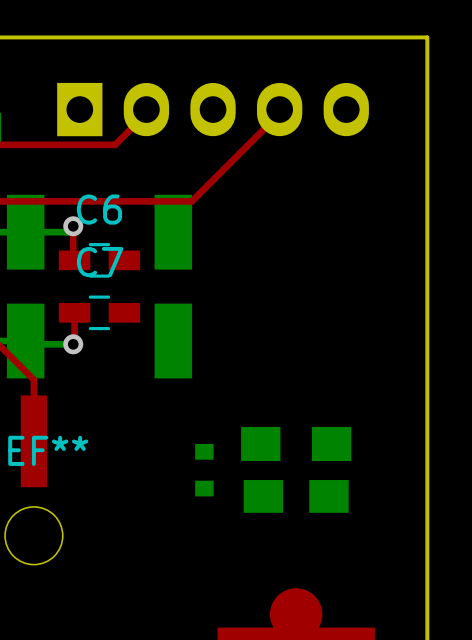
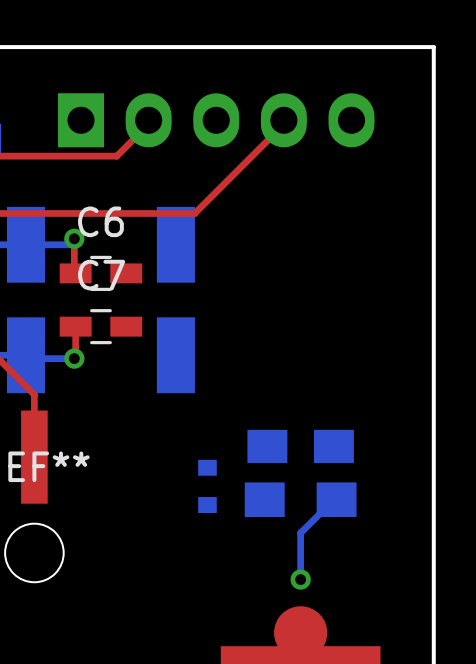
part footprint: [241, 426, 352, 462] -> [247, 429, 354, 464]
part footprint: [243, 480, 349, 513] -> [244, 482, 357, 518]
bottom track: none -> (336, 499) (333, 499) (300, 533) (300, 579)
via: none -> (300, 579)

